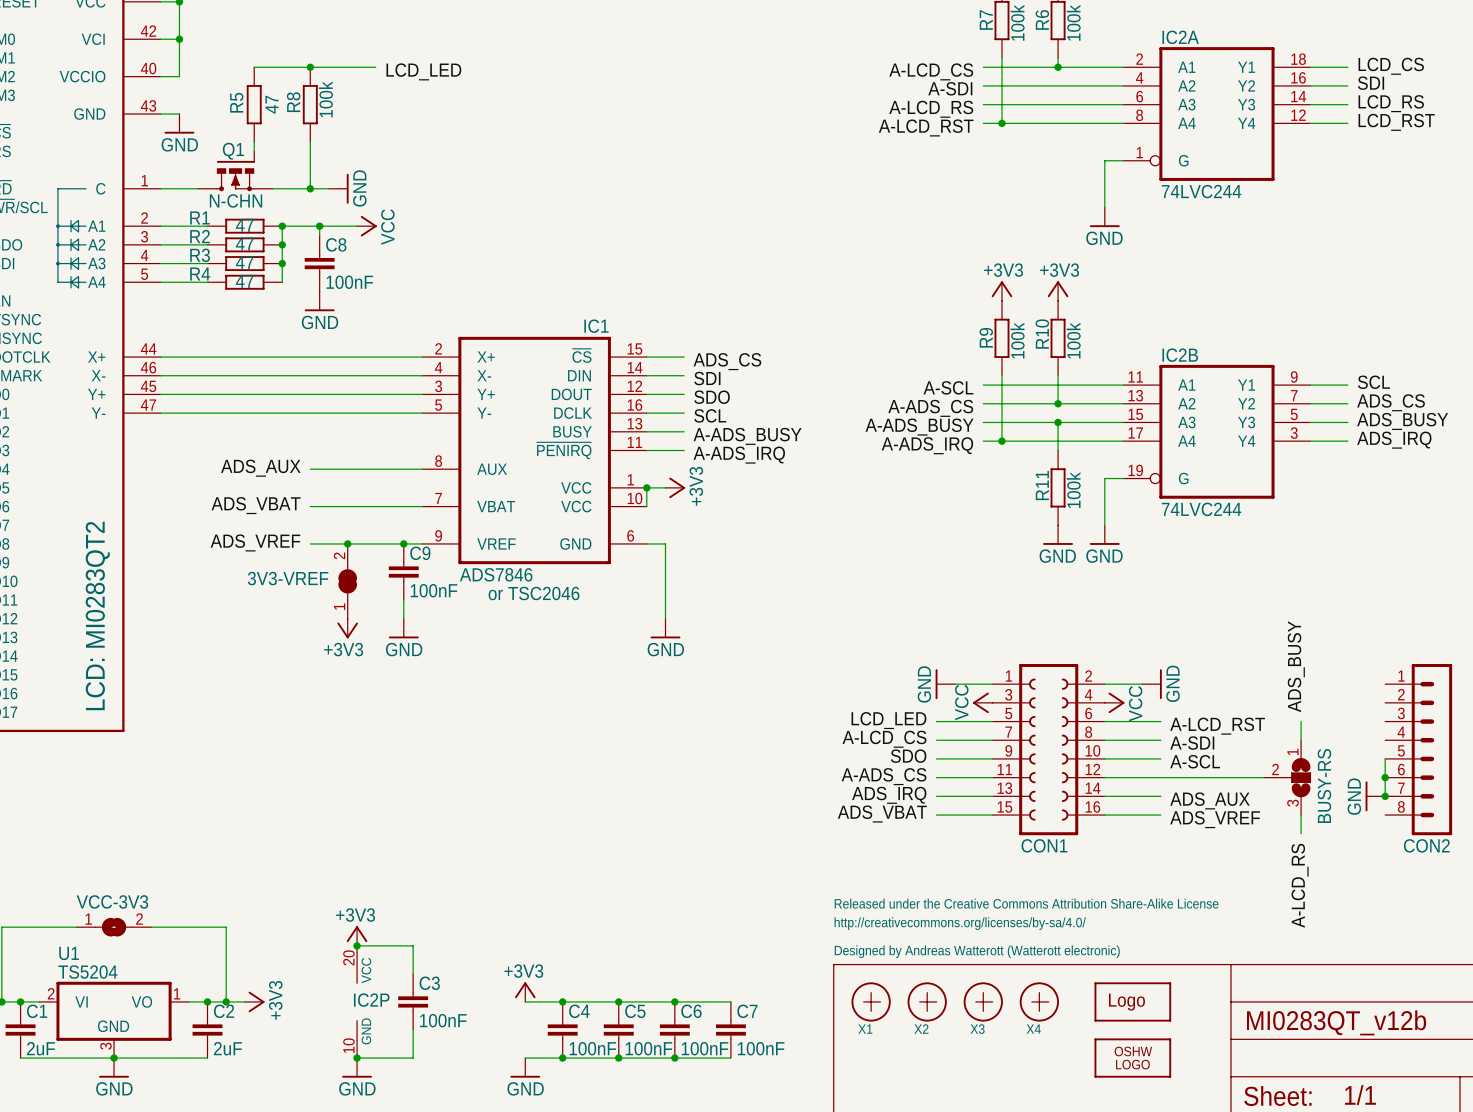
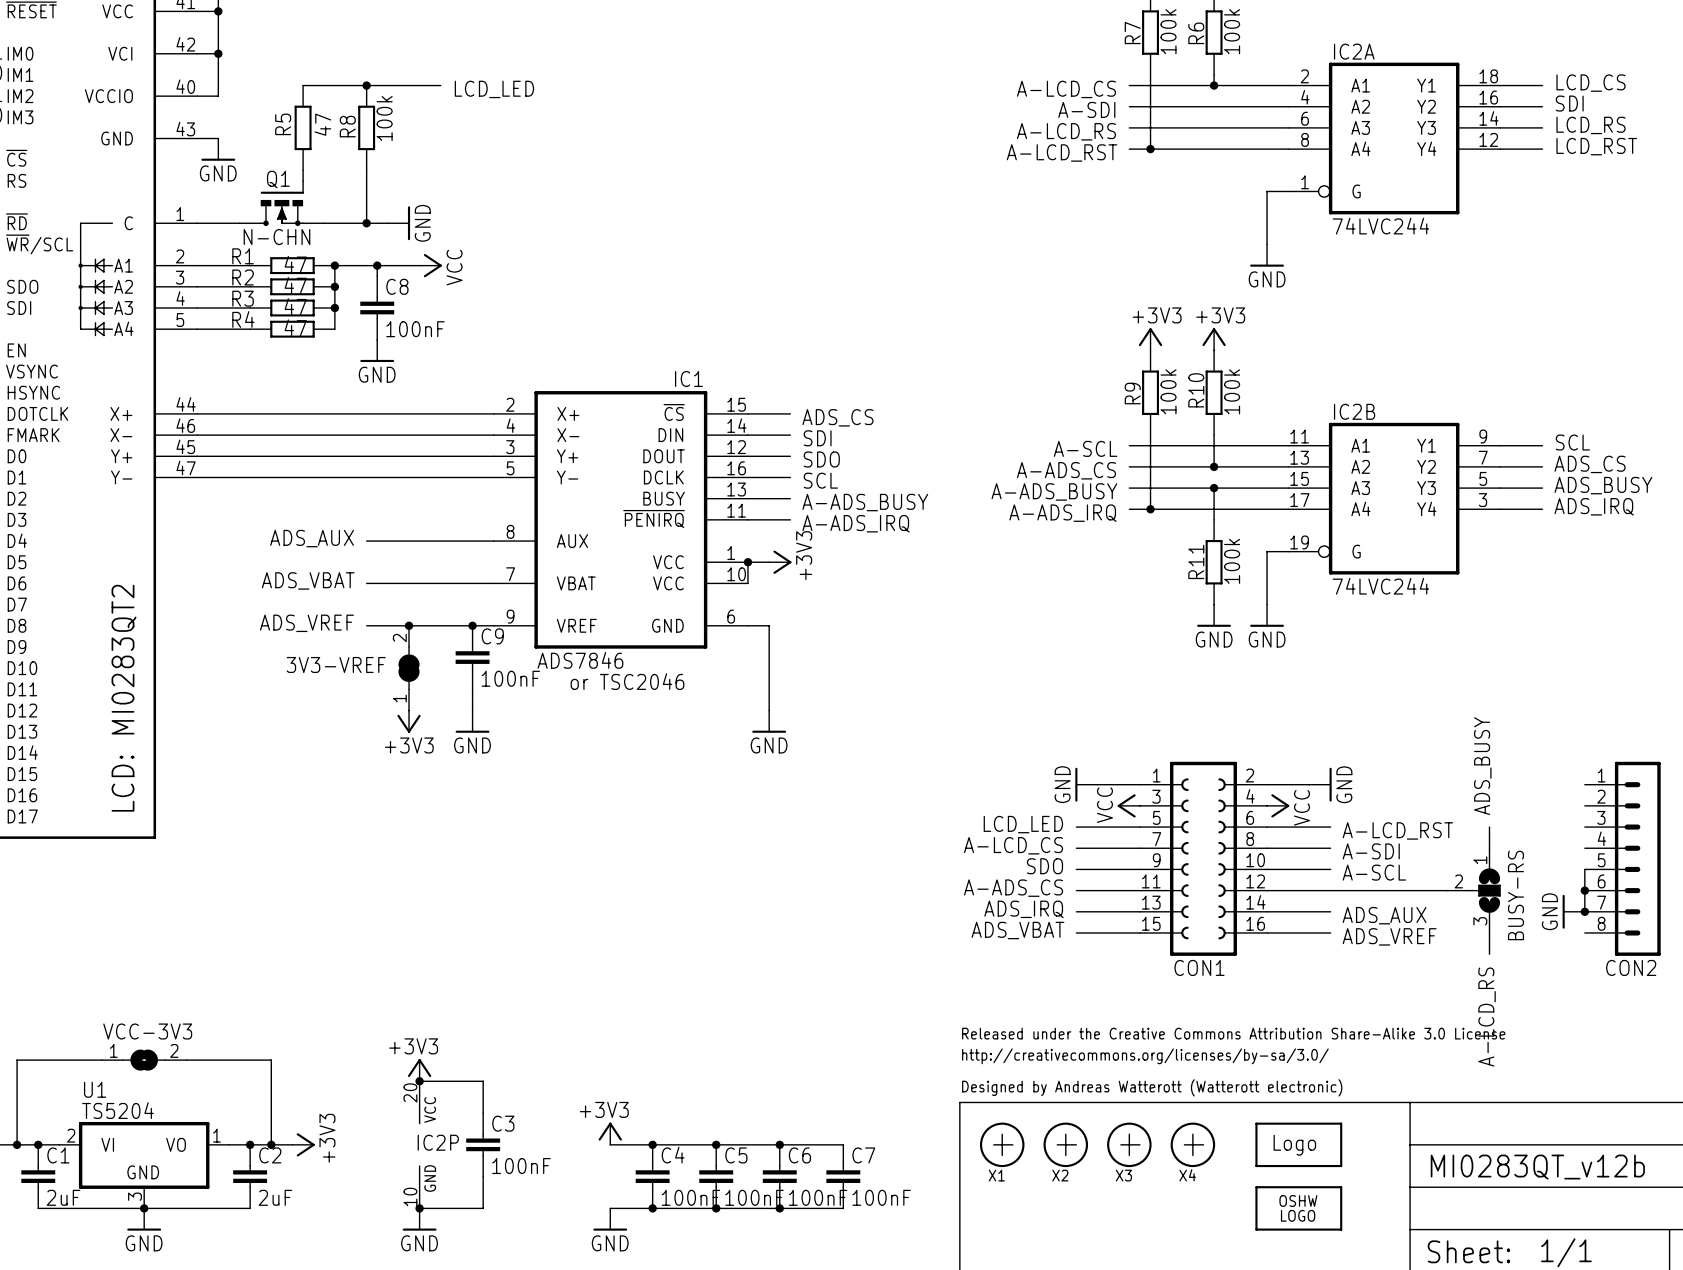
text: Released under the Creative Commons Attribution Share-Alike License (1026, 903) -> Released under the Creative Commons Attribution Share-Alike 3.0 License (1233, 1033)
text: http://creativecommons.org/licenses/by-sa/4.0/ (960, 923) -> http://creativecommons.org/licenses/by-sa/3.0/ (1145, 1056)

